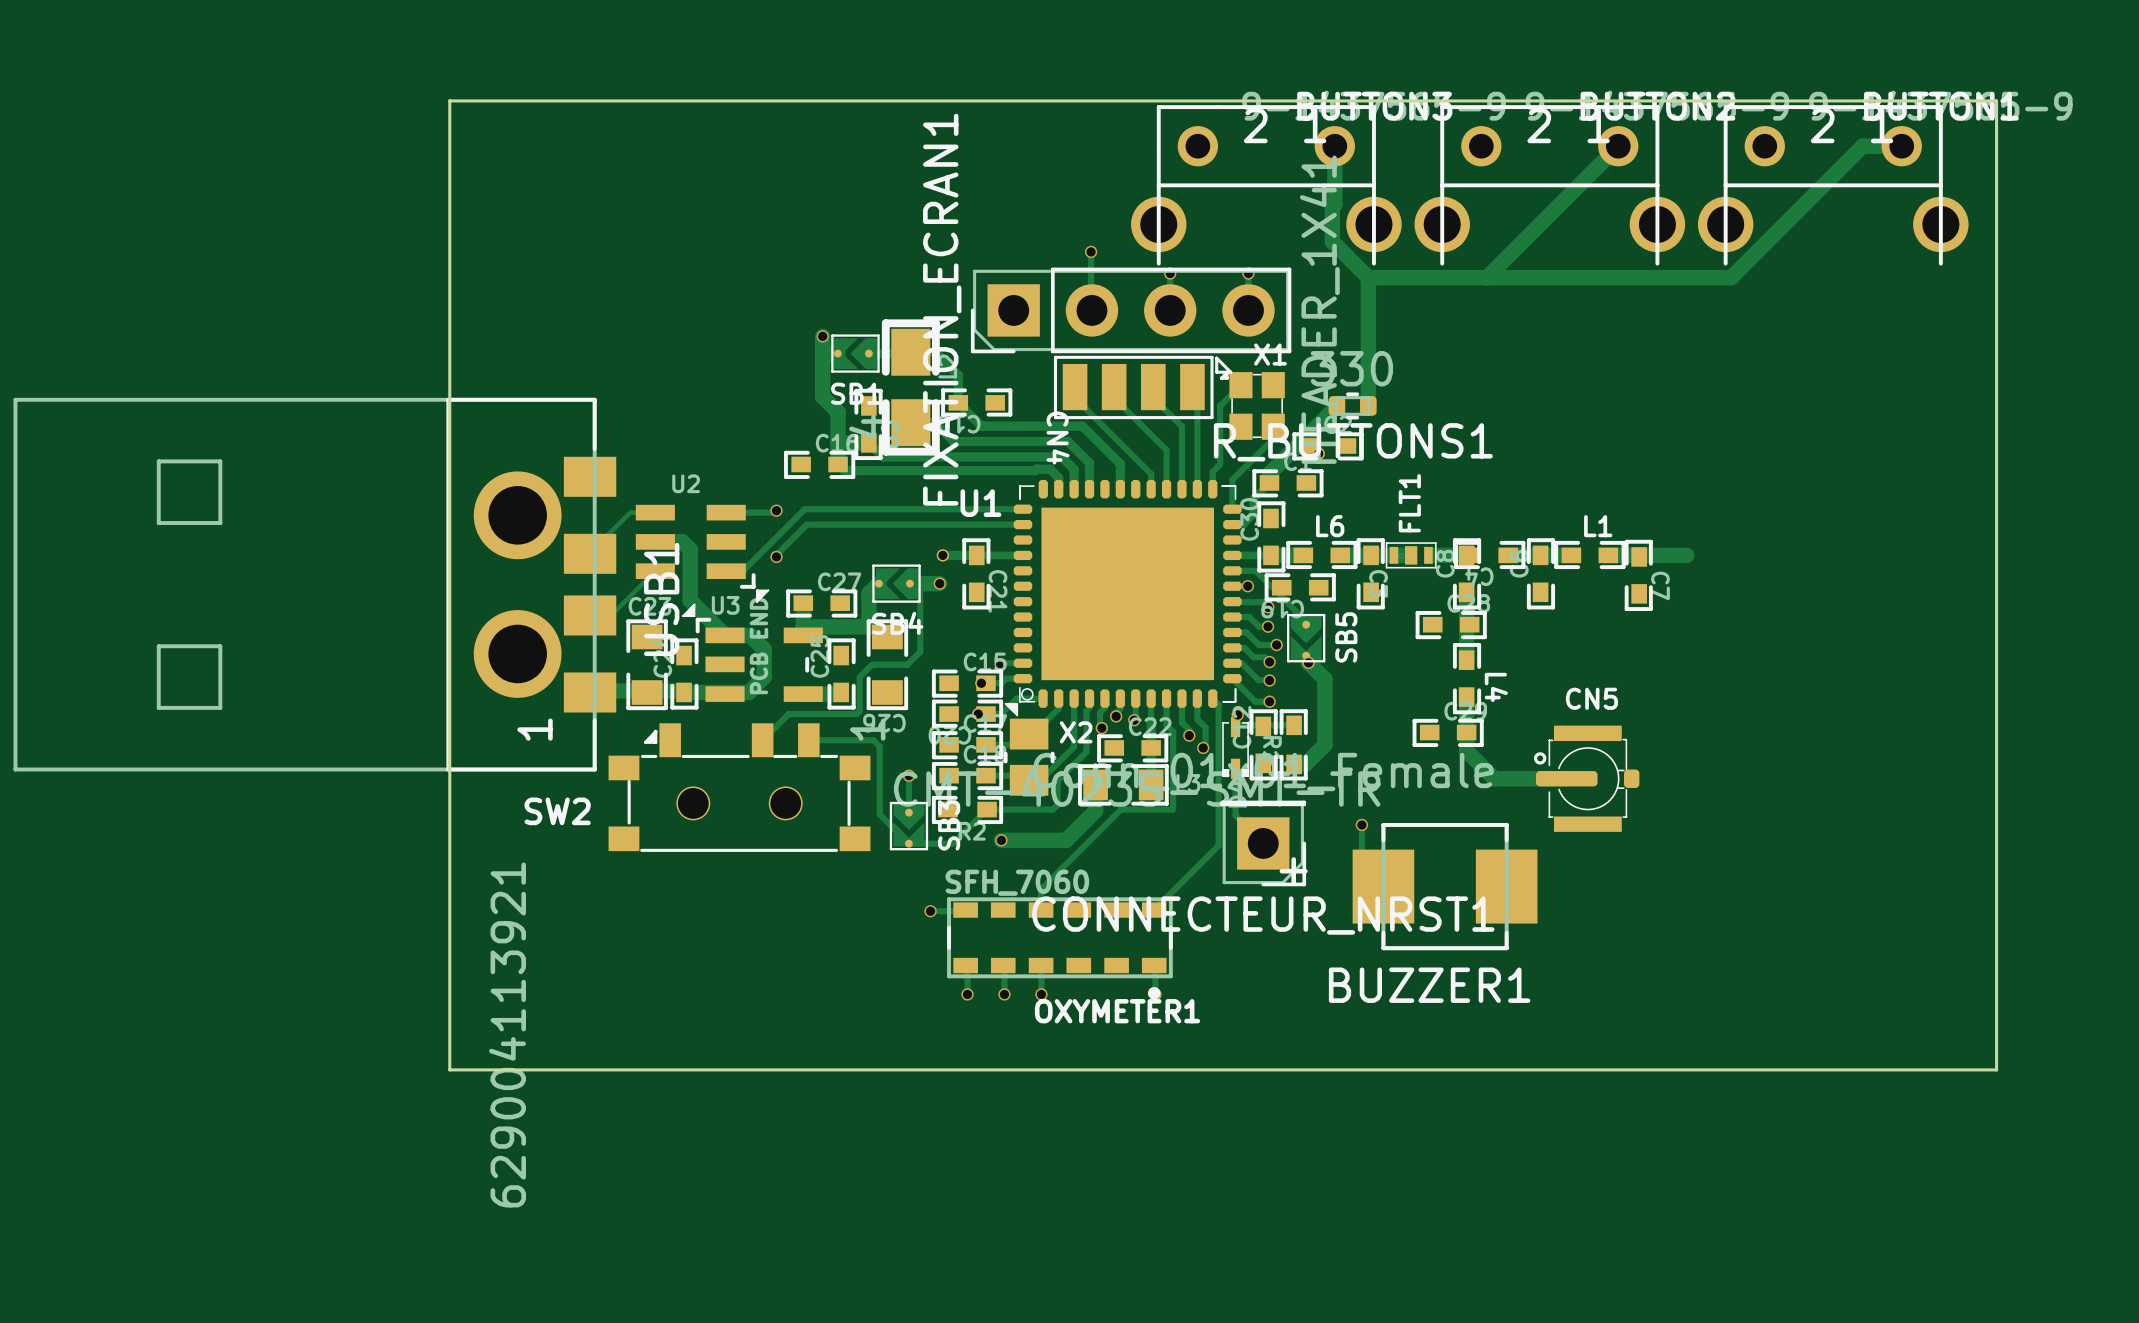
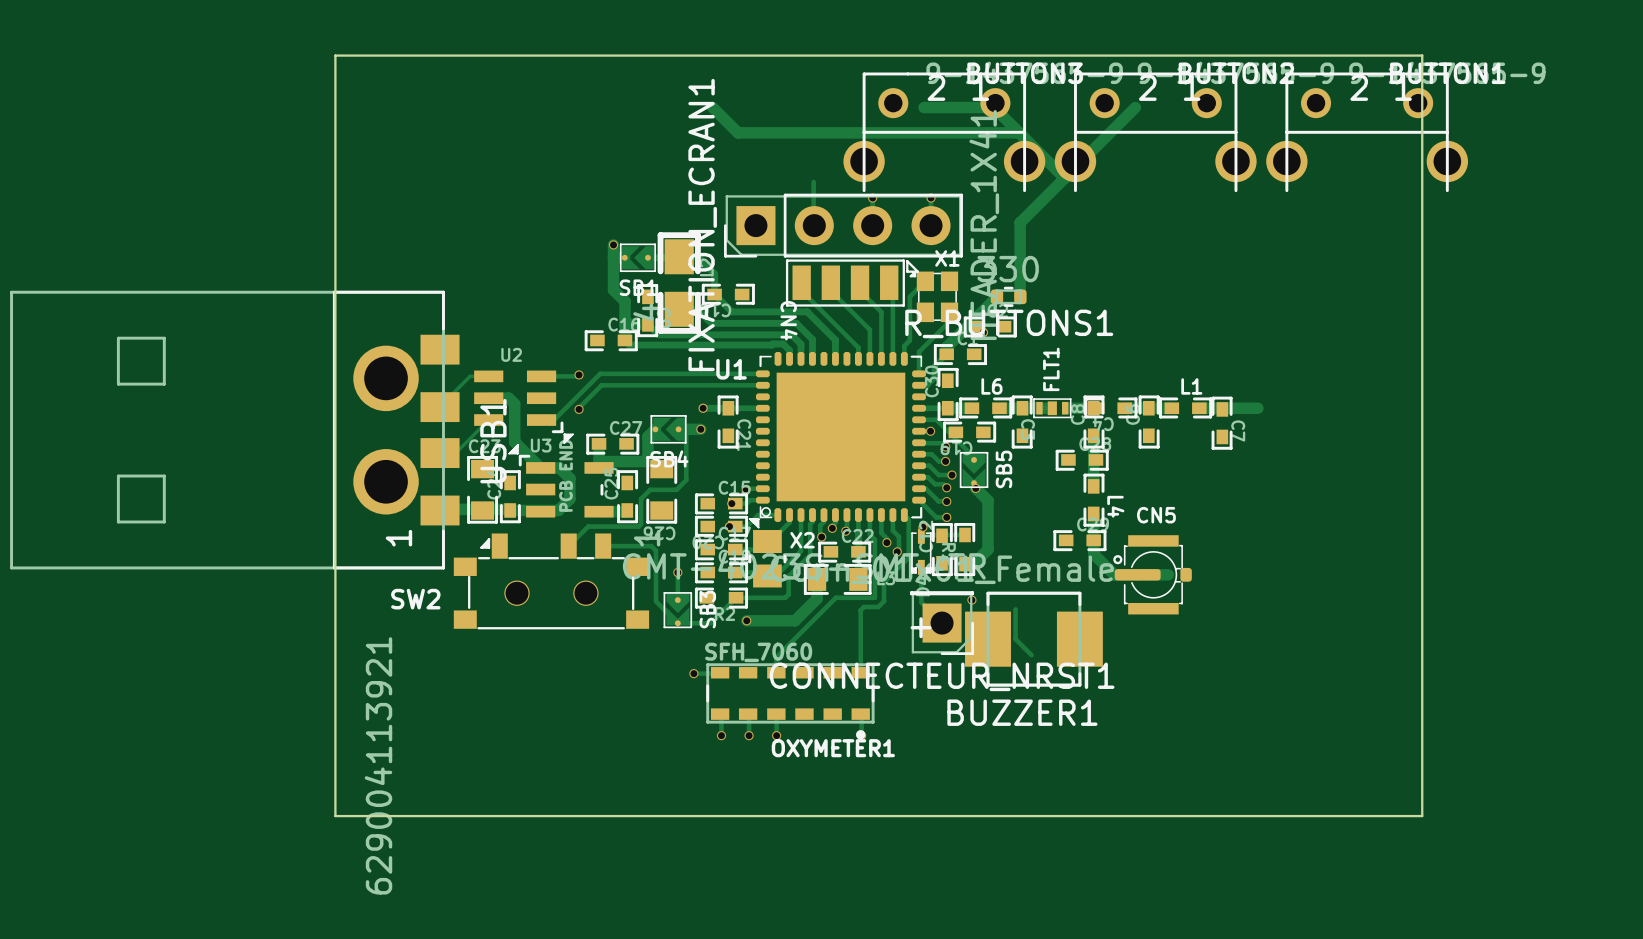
board edge: (449, 100) (1996, 100) (1996, 1069) (449, 1069) -> (335, 69) (335, 55) (1422, 55) (1422, 816) (335, 816) (335, 791)
track: (1334, 146) (1334, 204) (1332, 207) (1332, 241) (1368, 277) -> none
track: (1618, 146) (1486, 277) -> none
track: (1901, 146) (1862, 146) (1731, 277) (1368, 277) -> none
track: none -> (712, 107) (737, 132) (1019, 132)
track: none -> (924, 107) (993, 107) (1064, 178)
via: (1091, 251) -> none
track: (1368, 277) (1368, 405) -> (1135, 107) (1020, 222) (1020, 296)
track: (1218, 755) (1218, 845) (1154, 910) -> (908, 557) (884, 582) (884, 601) (878, 606) (863, 606) (860, 610) (860, 672)
CN5 position: (1586, 778) -> (1152, 574)
via position: (1361, 824) -> (971, 600)
BUZZER1 position: (1445, 886) -> (1033, 639)

